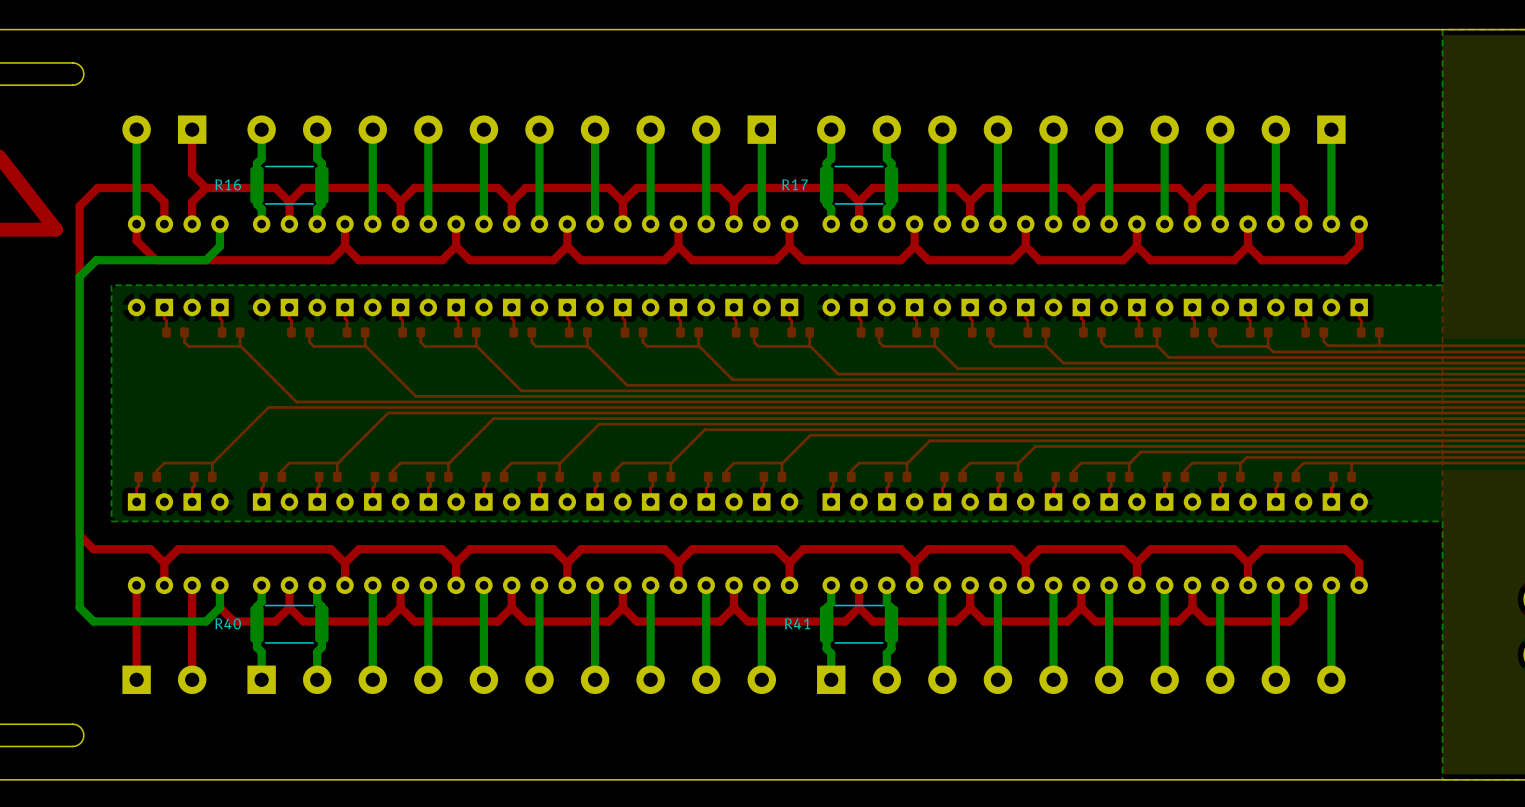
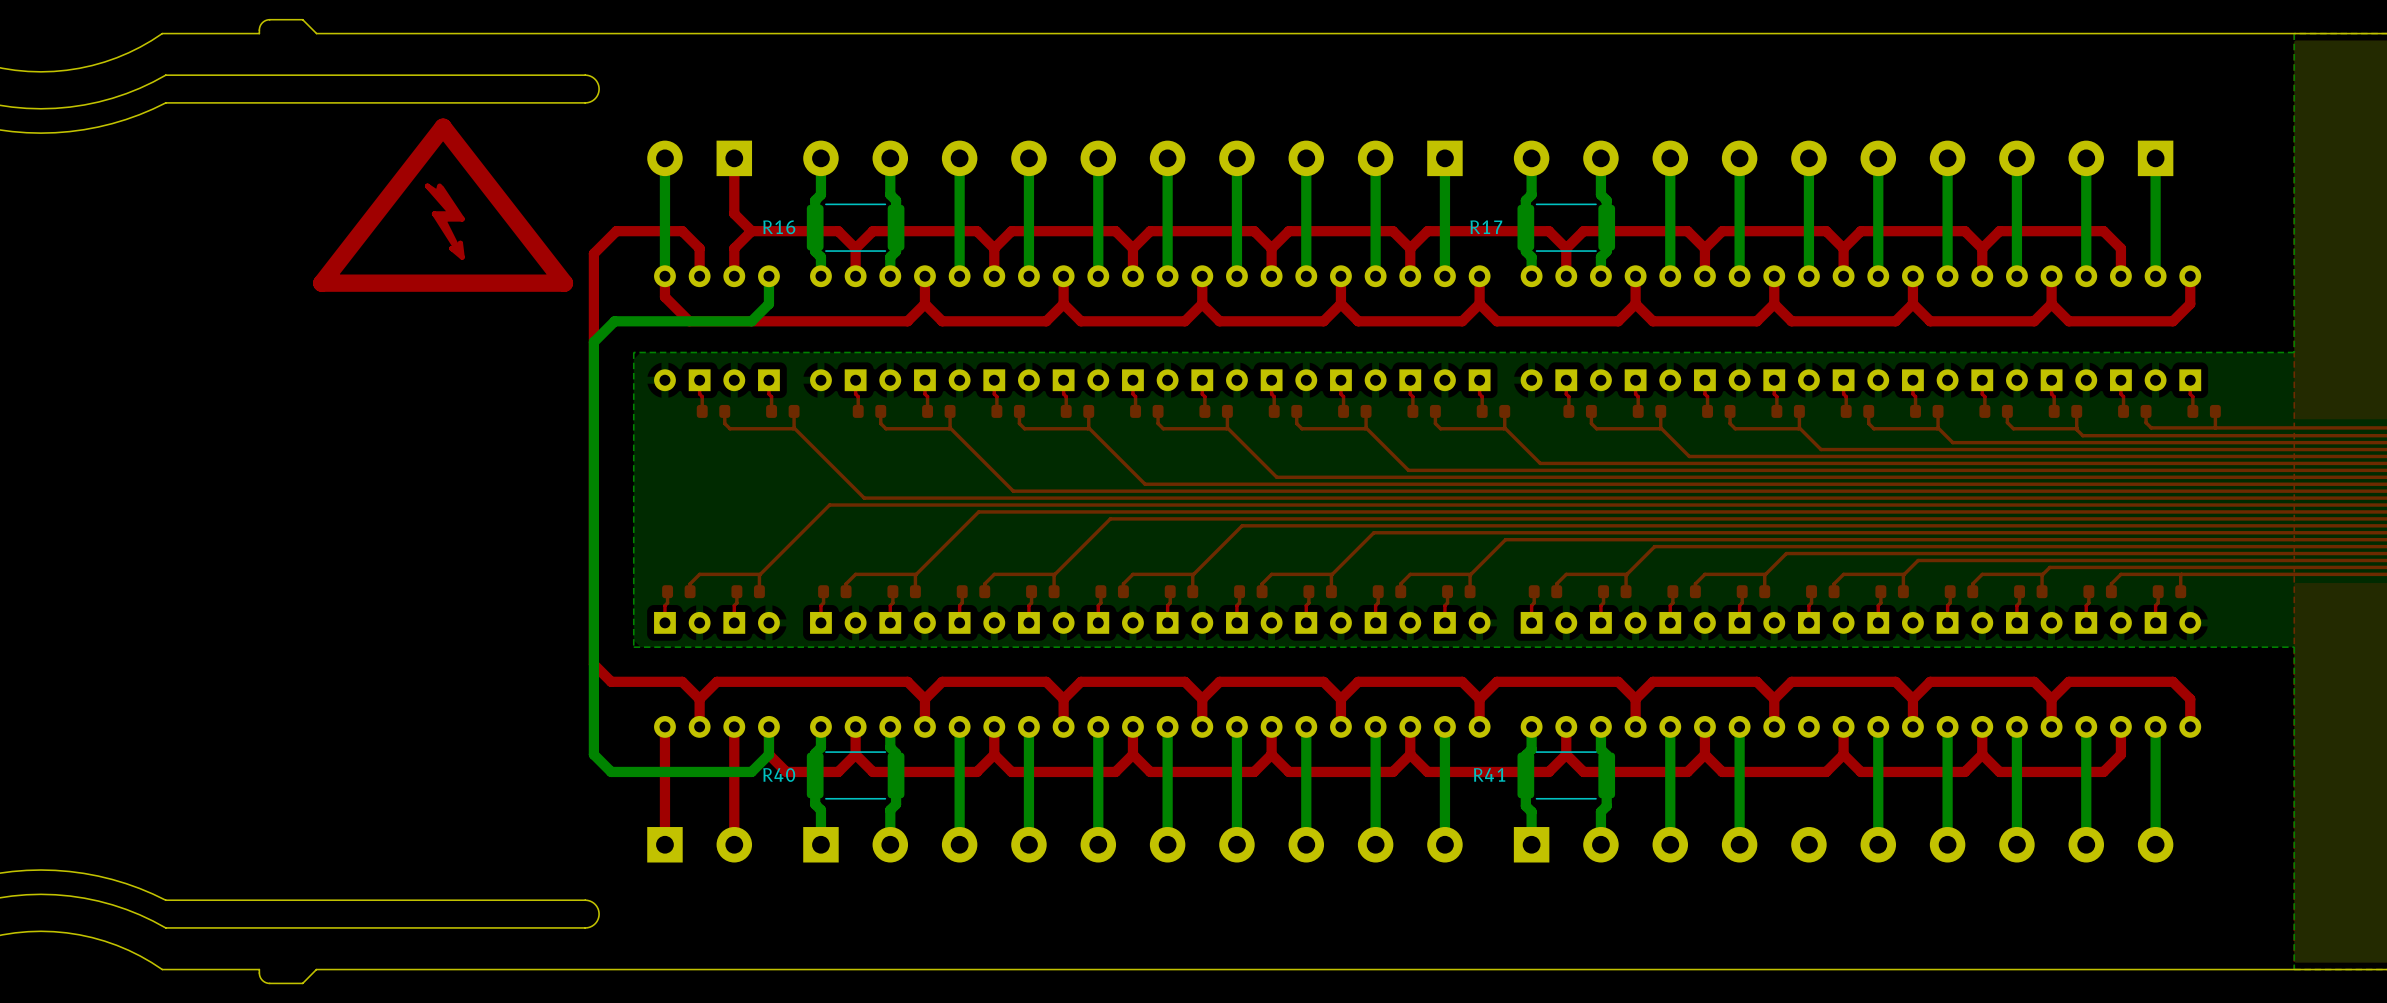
bottom track: (1053, 585) (1053, 679) -> none

